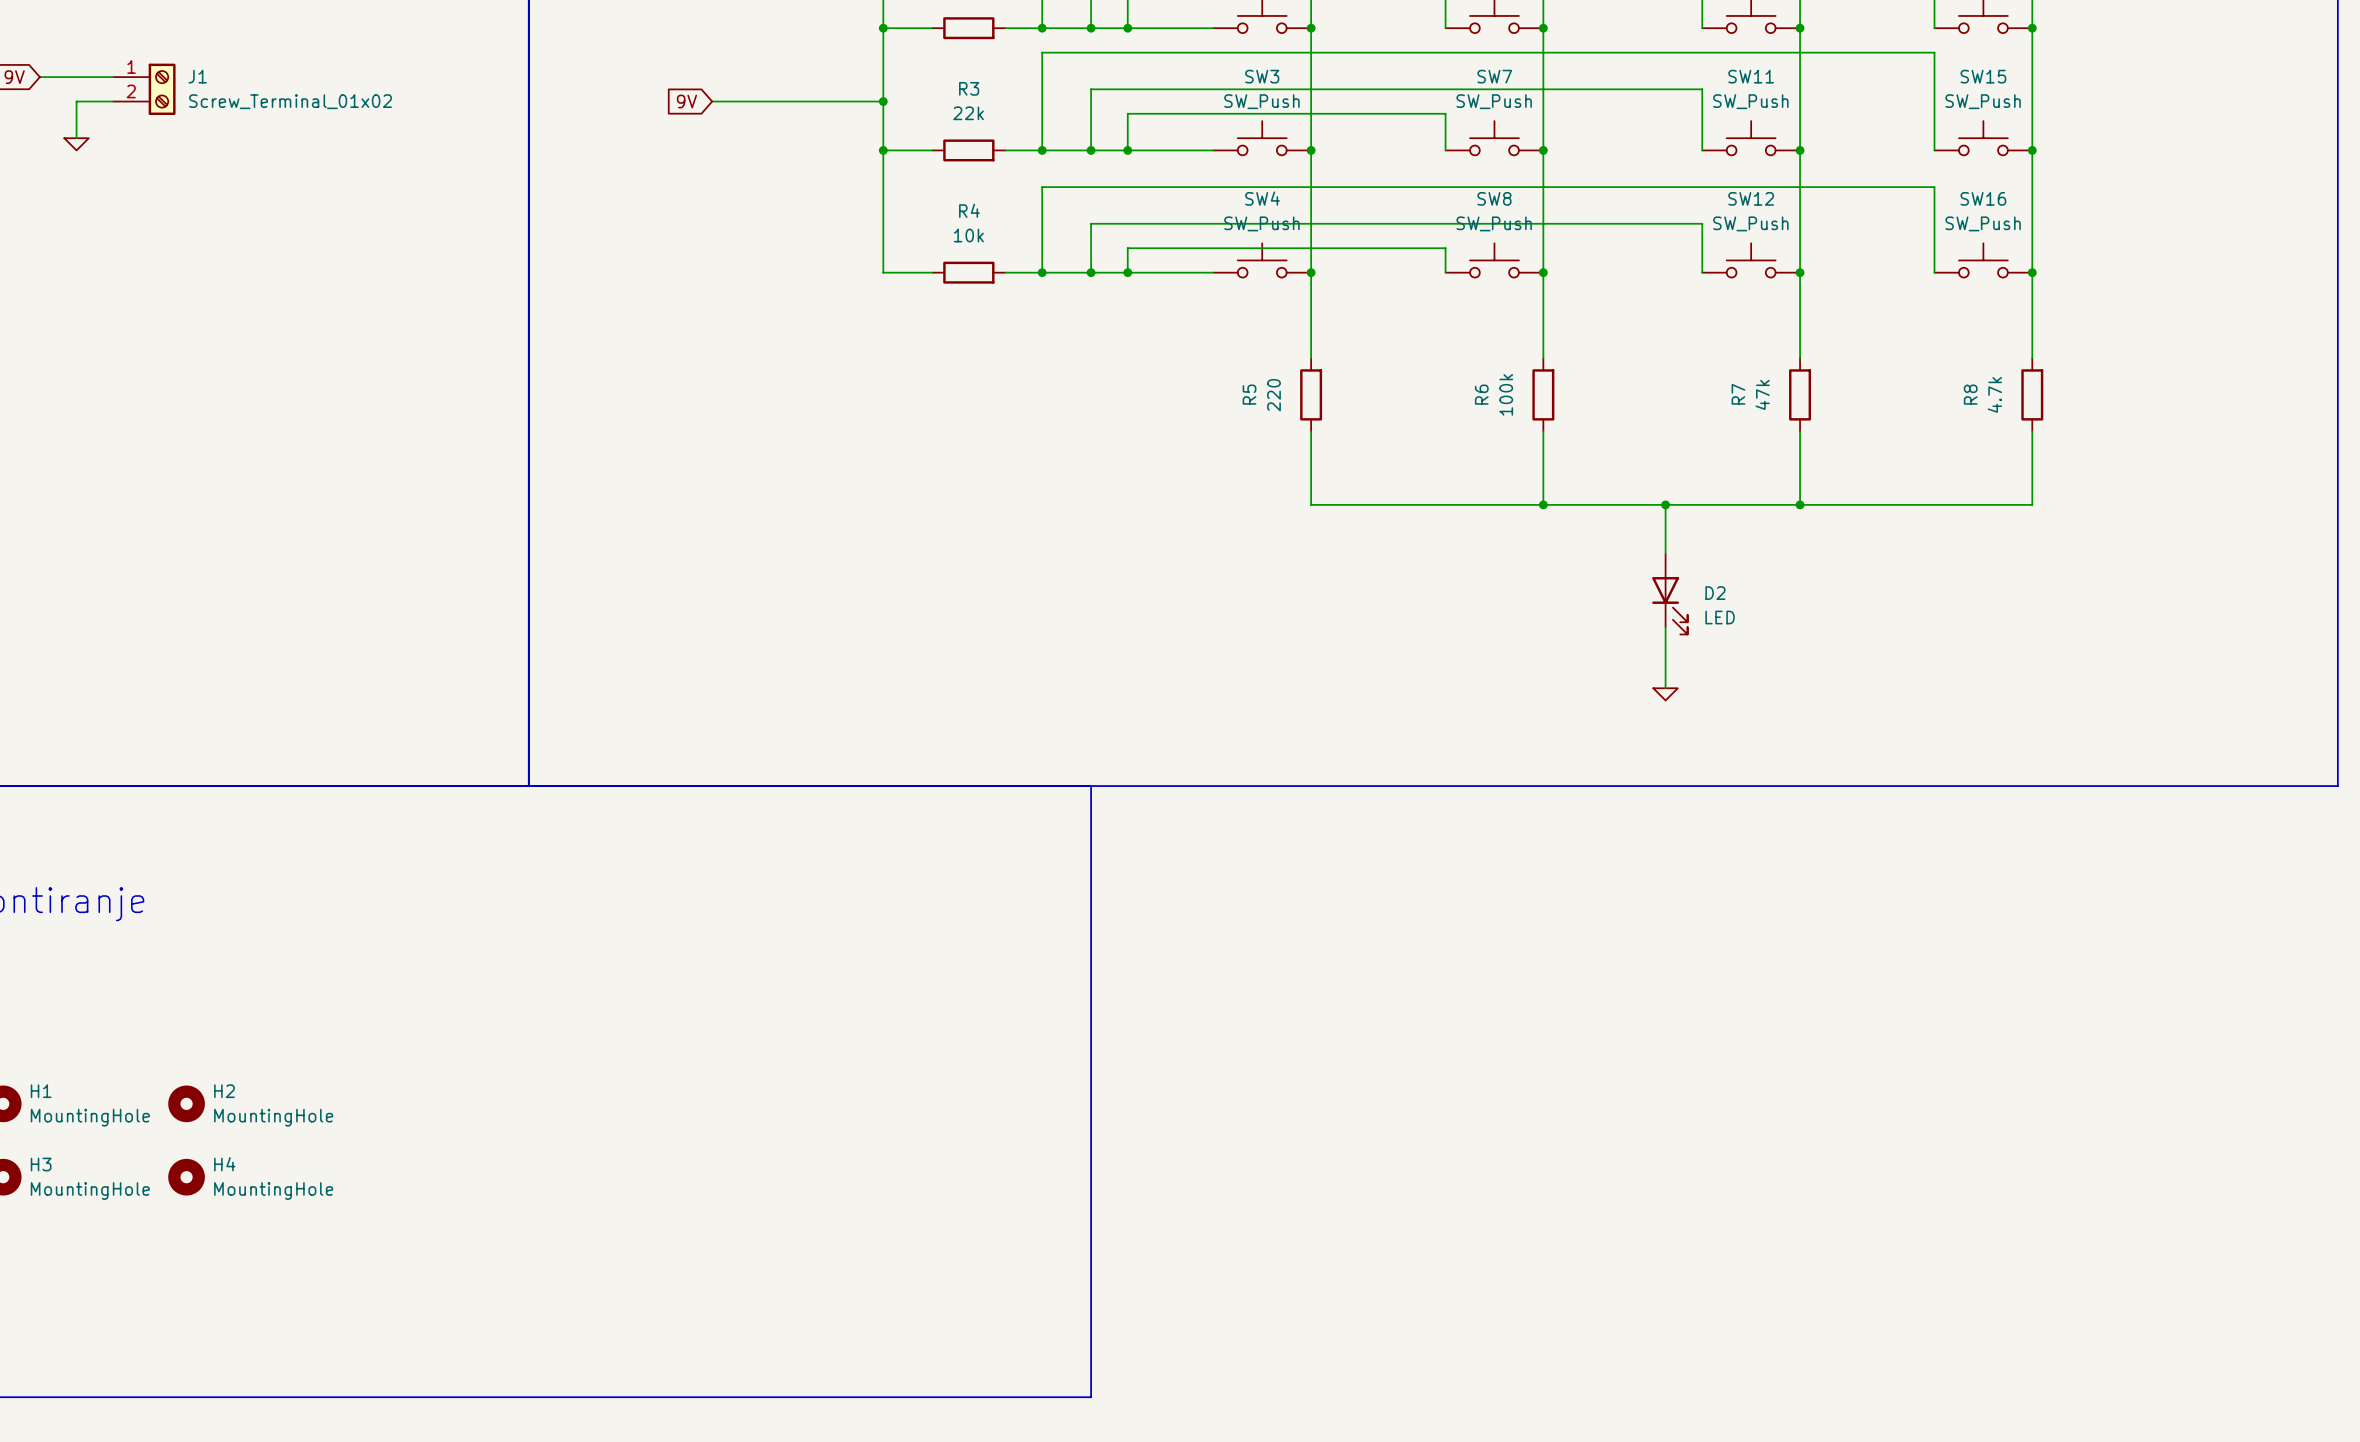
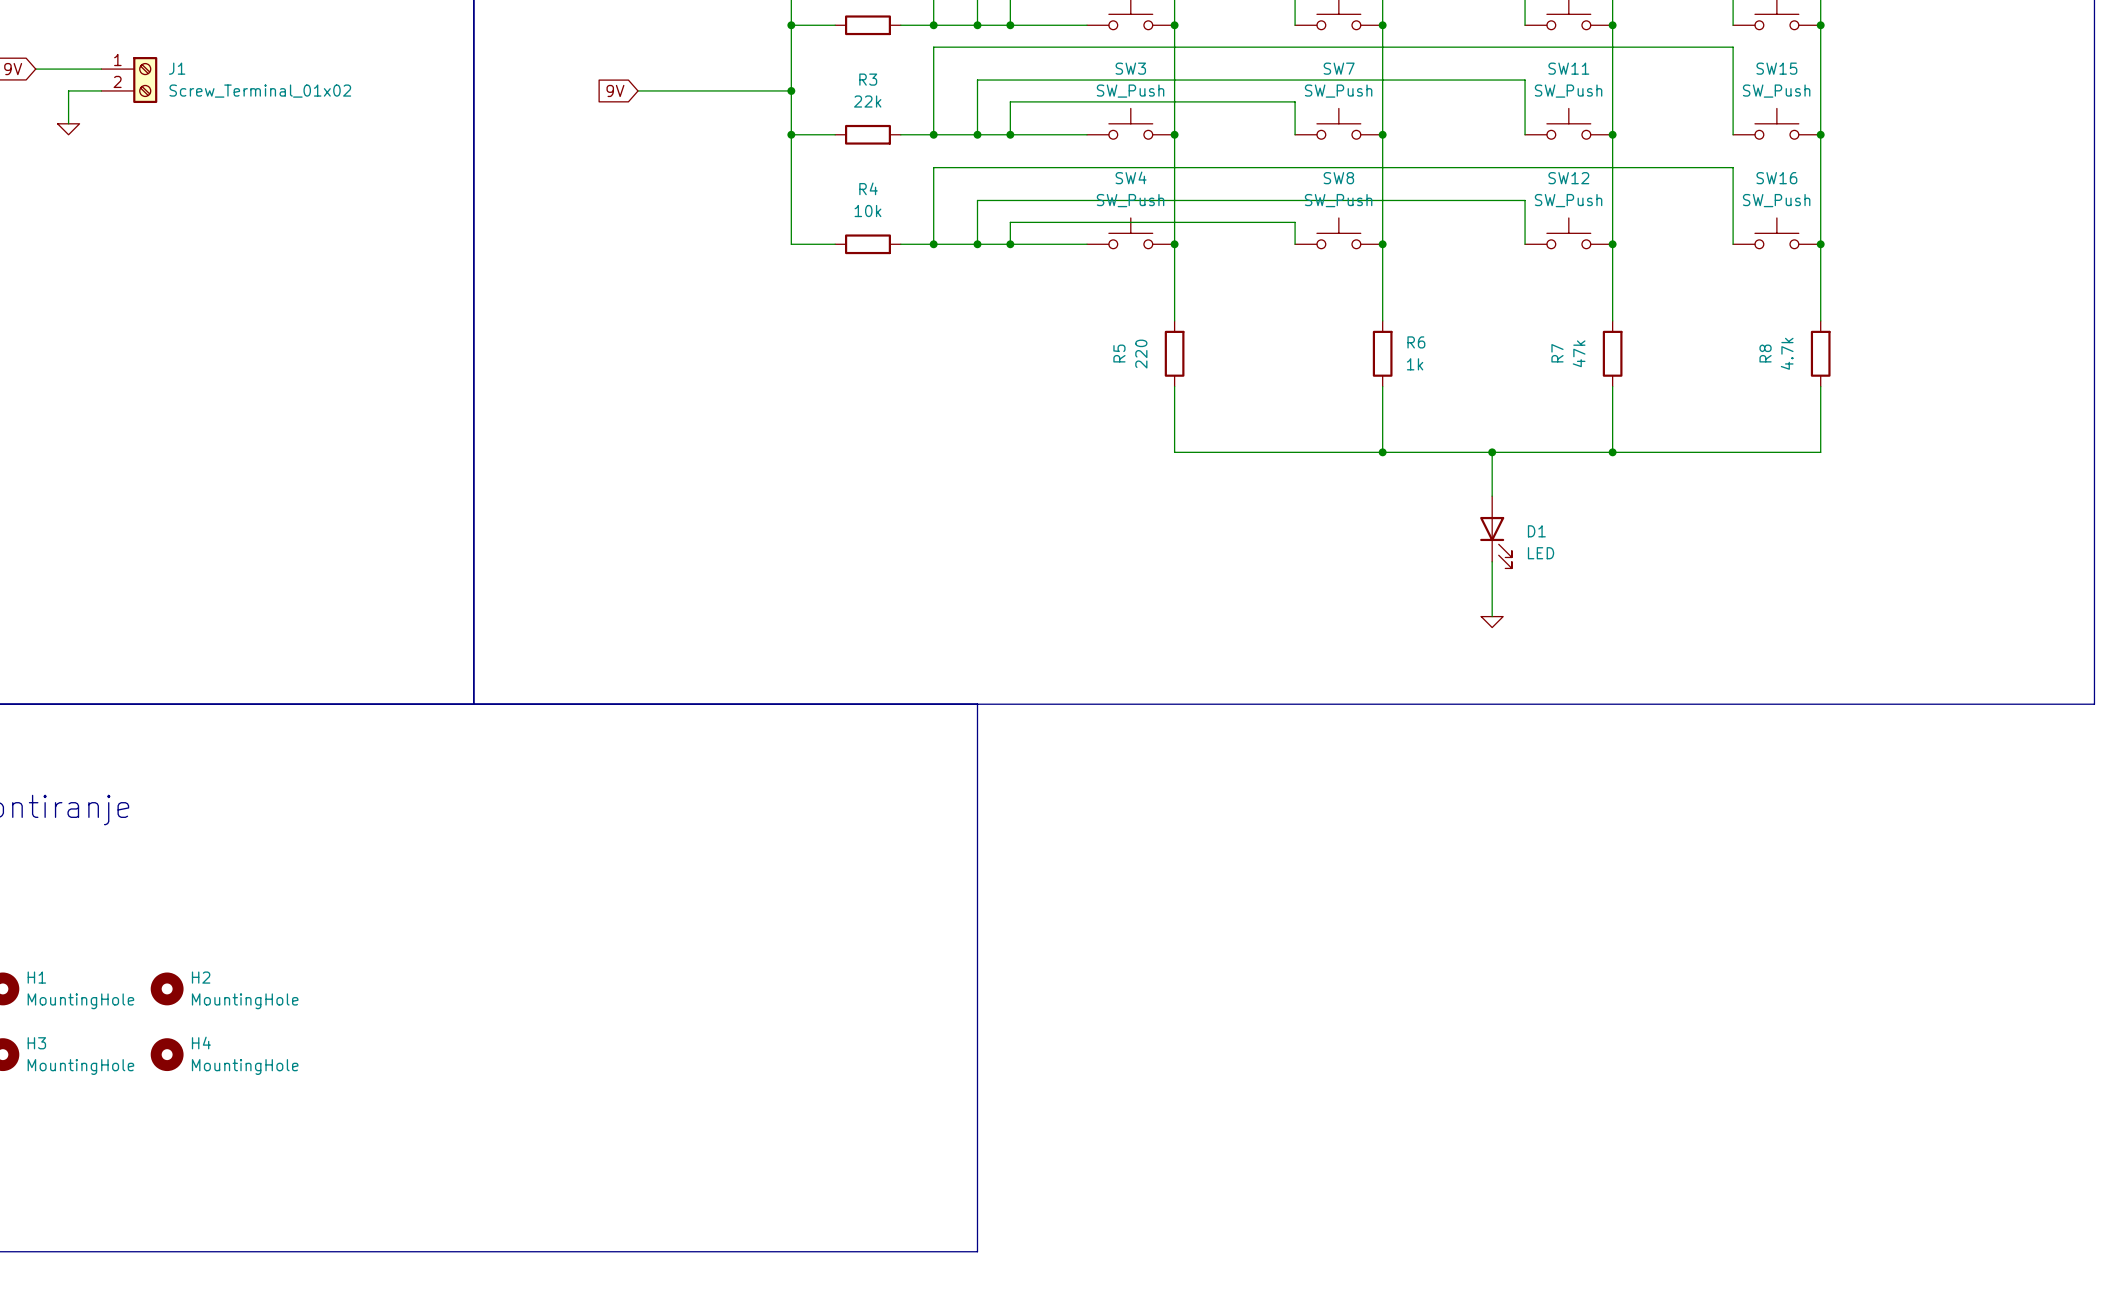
R6 name rotation: 0° (1481, 394) -> 90° clockwise (1416, 342)
R6 name position: R6 (1481, 394) -> R6 (1416, 342)
R6 value: 100k (1506, 394) -> 1k (1415, 364)
D2 name: D2 (1715, 593) -> D1 (1536, 531)

